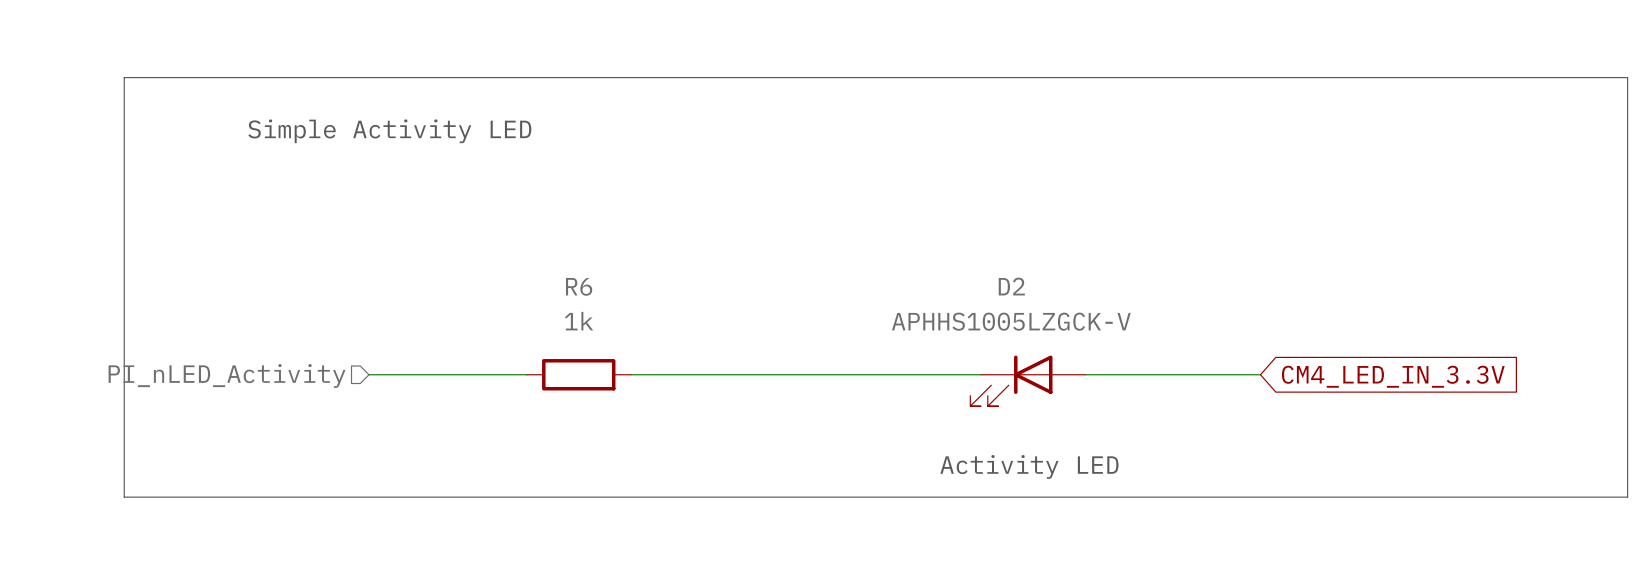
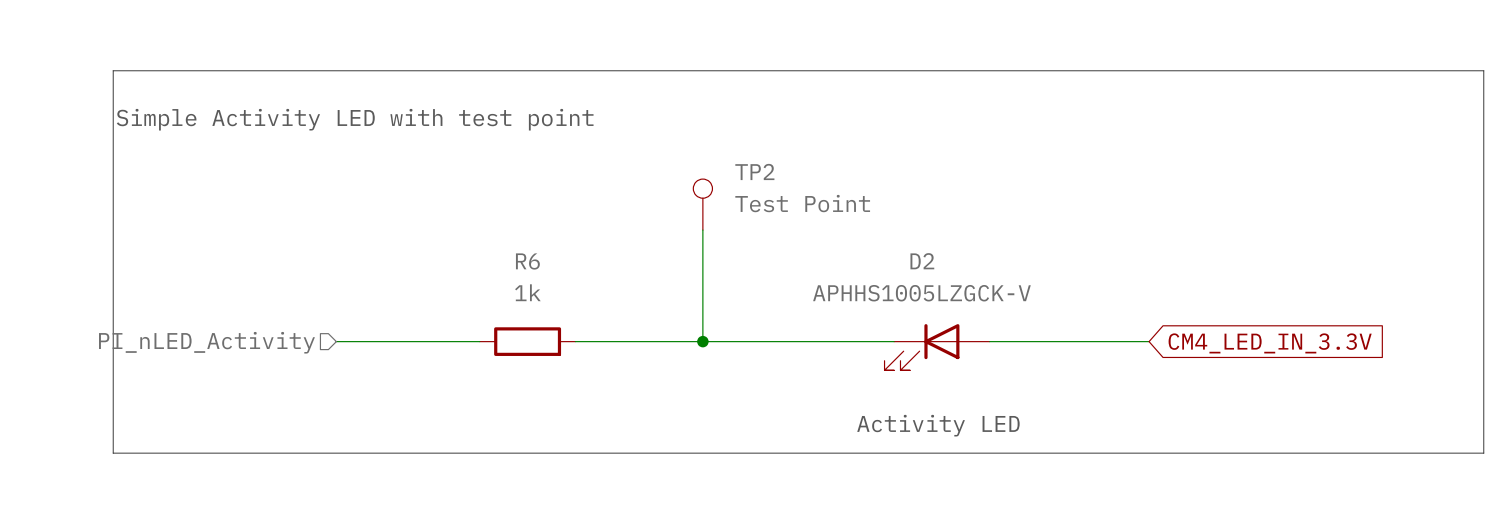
text: Simple Activity LED (389, 131) -> Simple Activity LED with test point (355, 119)
TP2: none -> Test Point (702, 204)
wire: none -> (702, 230) (702, 341)
junction: none -> (702, 341)

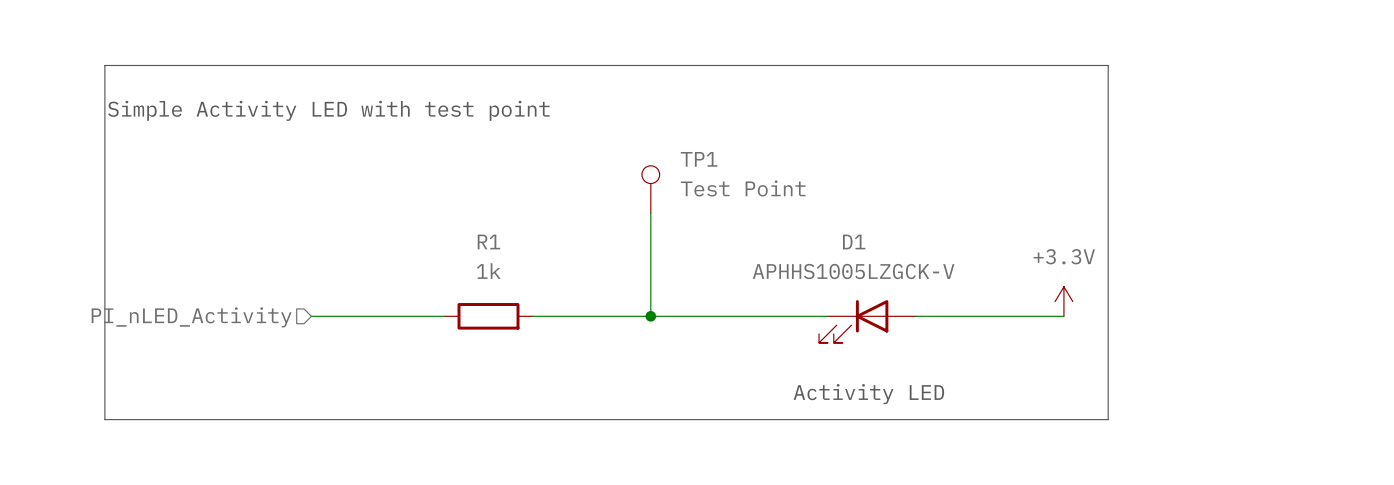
line: (1196, 70) (1483, 70) (1483, 453) (1196, 453) -> (1108, 65) (1108, 419)
TP2 name: TP2 (754, 171) -> TP1 (699, 159)
R6 name: R6 (527, 261) -> R1 (488, 241)
D2 name: D2 (922, 261) -> D1 (854, 241)
power symbol: none -> +3.3V (1063, 301)
global label: CM4_LED_IN_3.3V (1270, 343) -> none

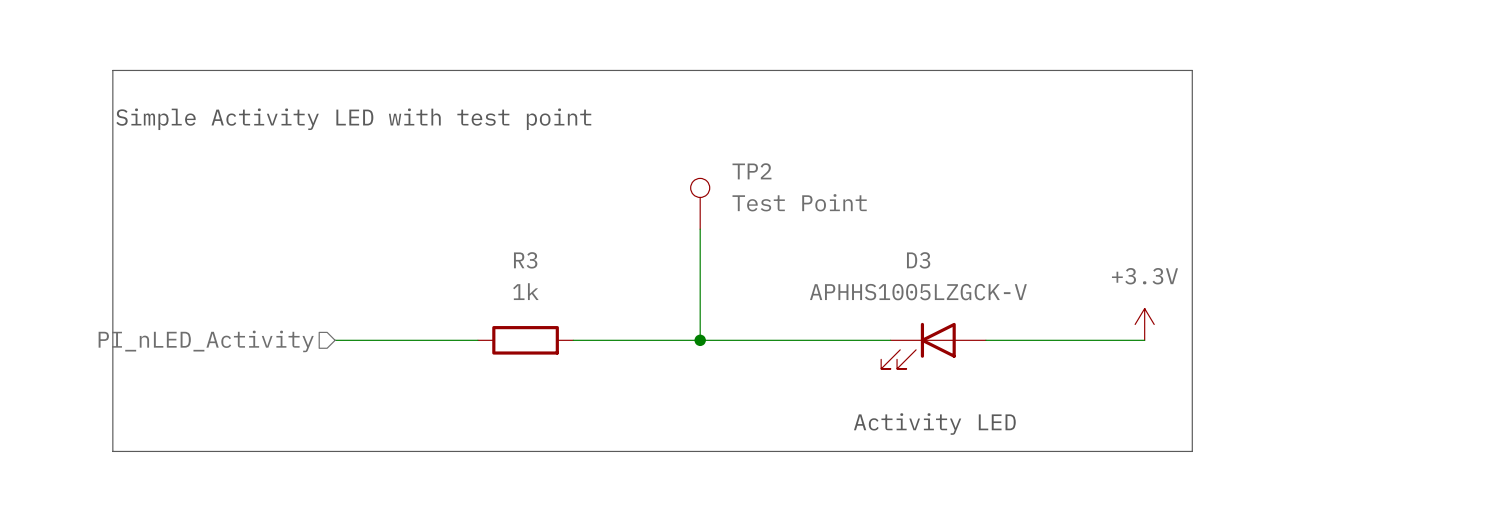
TP1 name: TP1 (699, 159) -> TP2 (751, 171)
R1 name: R1 (488, 241) -> R3 (525, 260)
D1 name: D1 (854, 241) -> D3 (918, 260)

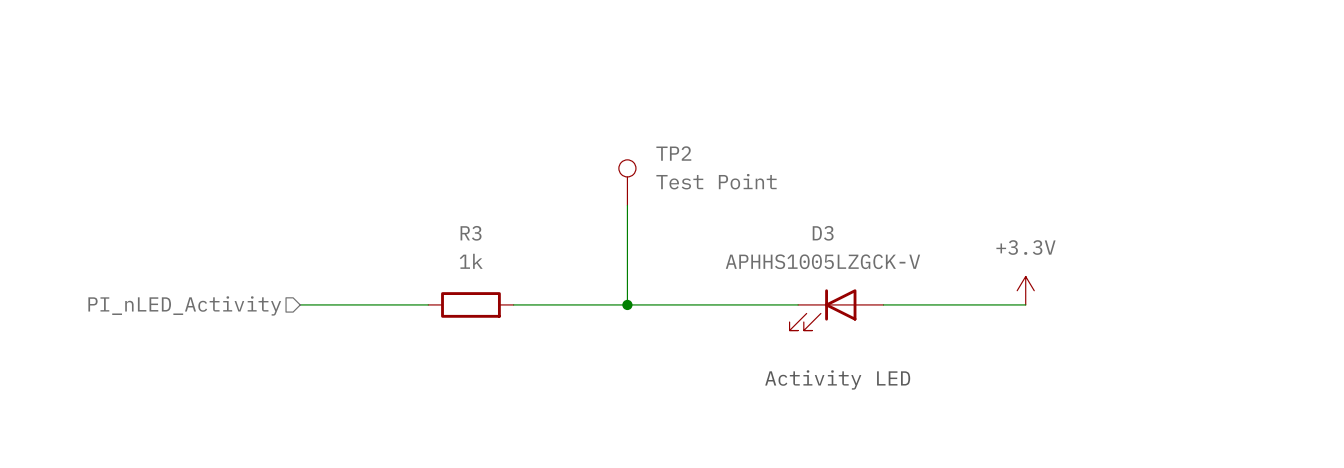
line: (112, 70) (1192, 70) (1192, 451) (112, 451) (112, 70) -> none
text: Simple Activity LED with test point (353, 119) -> none

